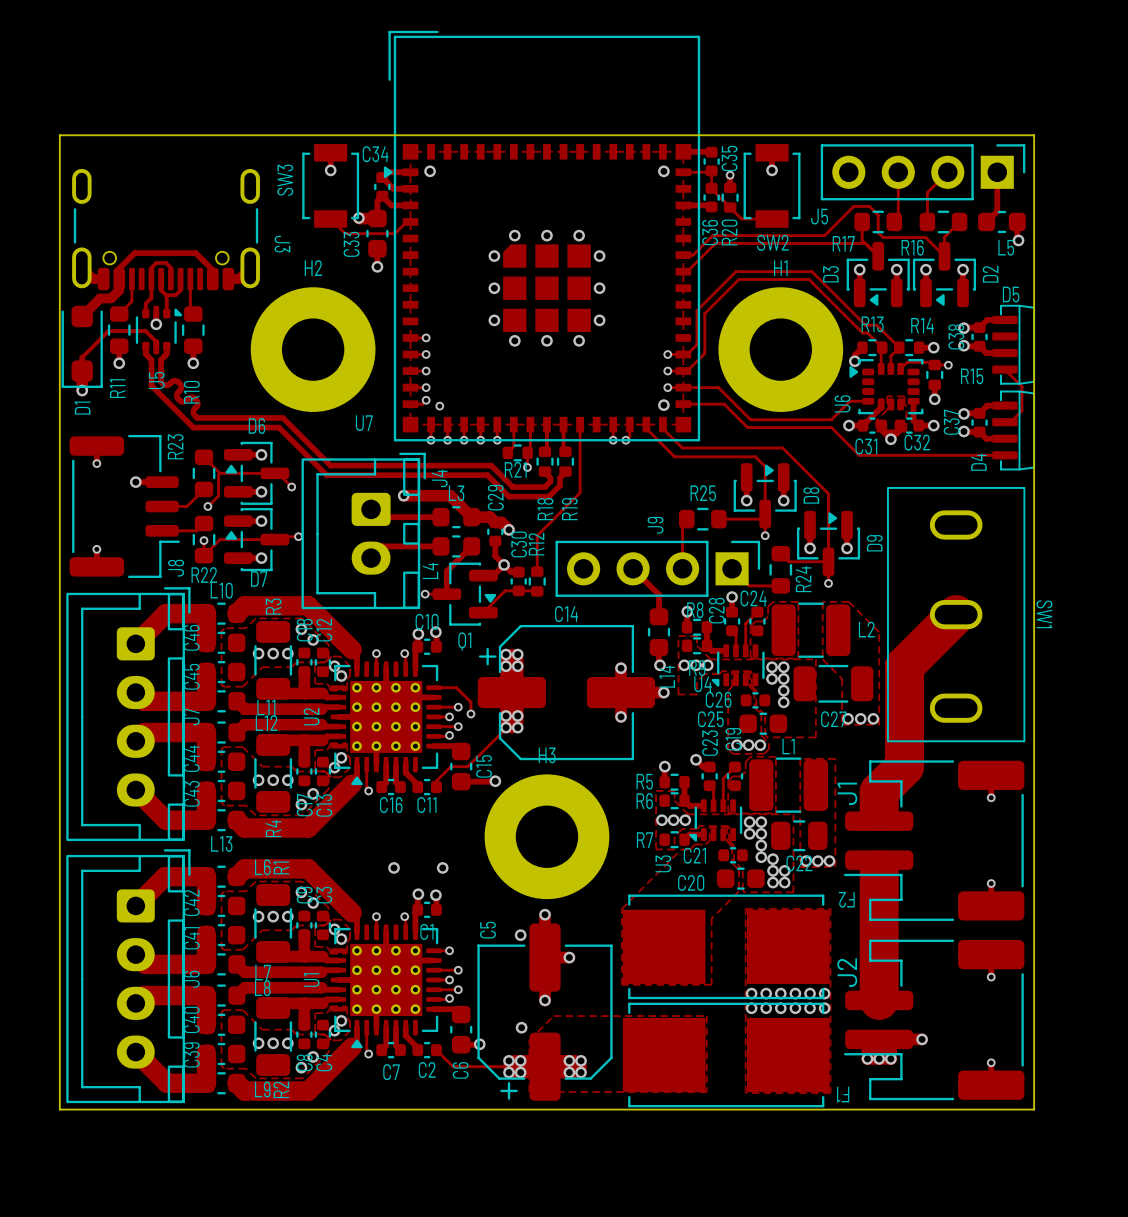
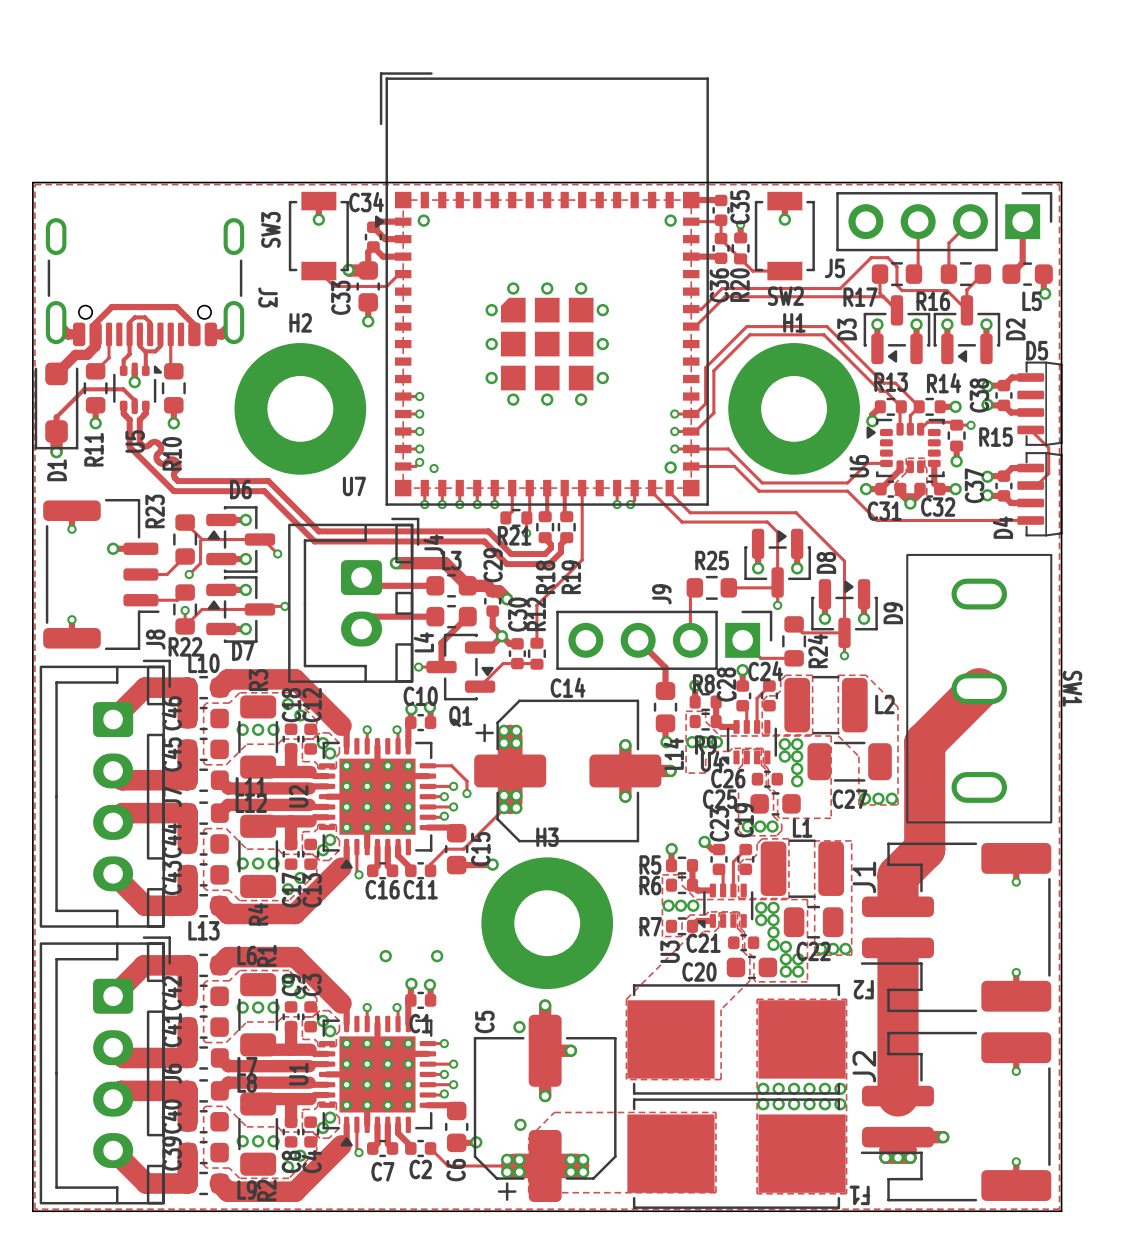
zone outline: none -> (34, 184) (1059, 184) (1059, 1209) (34, 1209) (34, 184)

